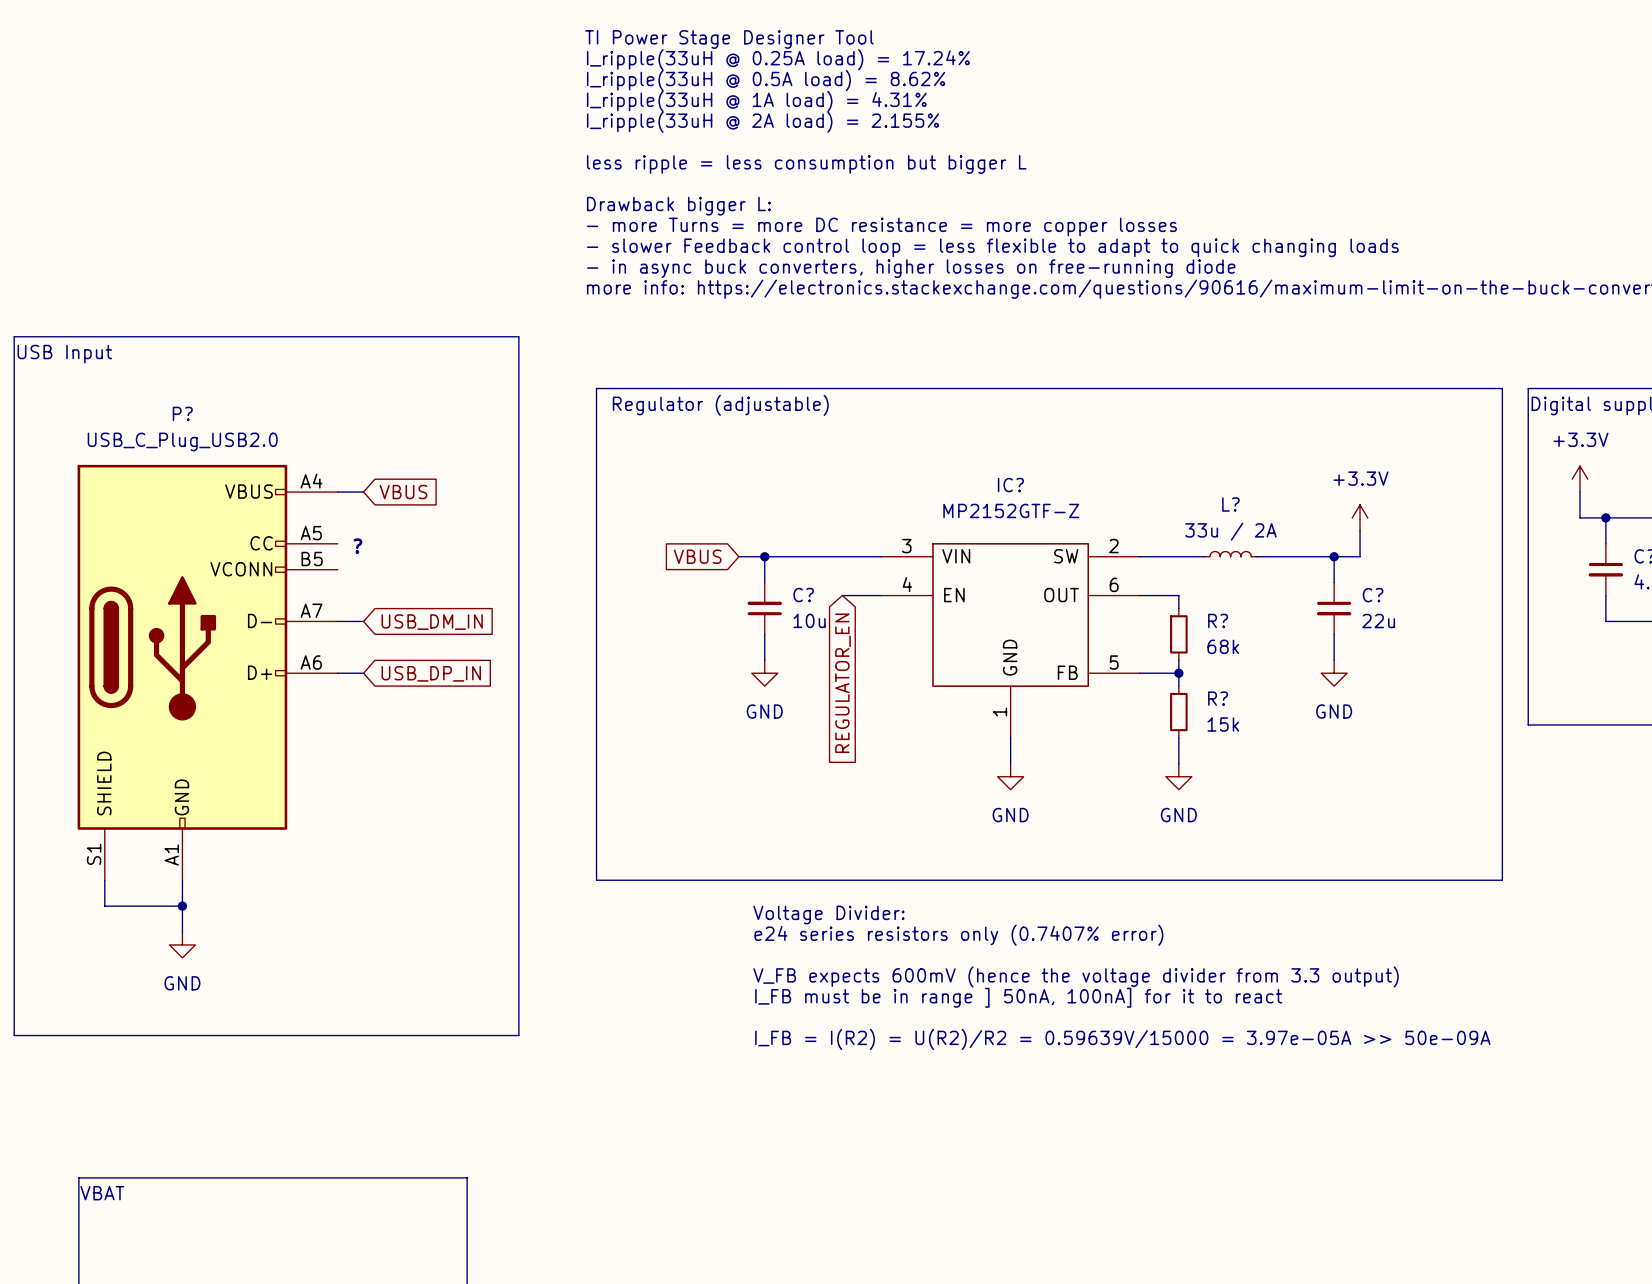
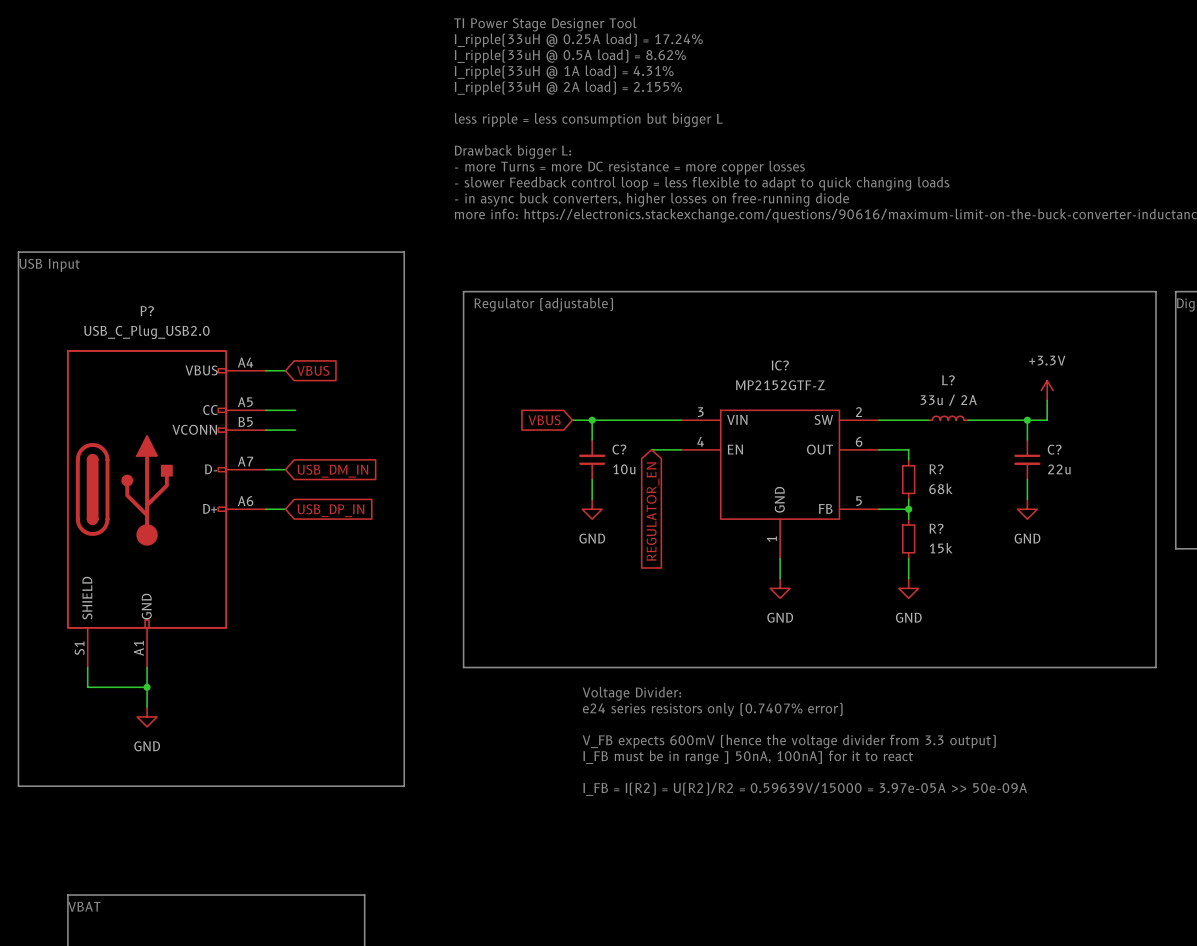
wire: none -> (265, 410) (295, 410)
text: ? (357, 546) -> none
wire: none -> (265, 430) (295, 430)

